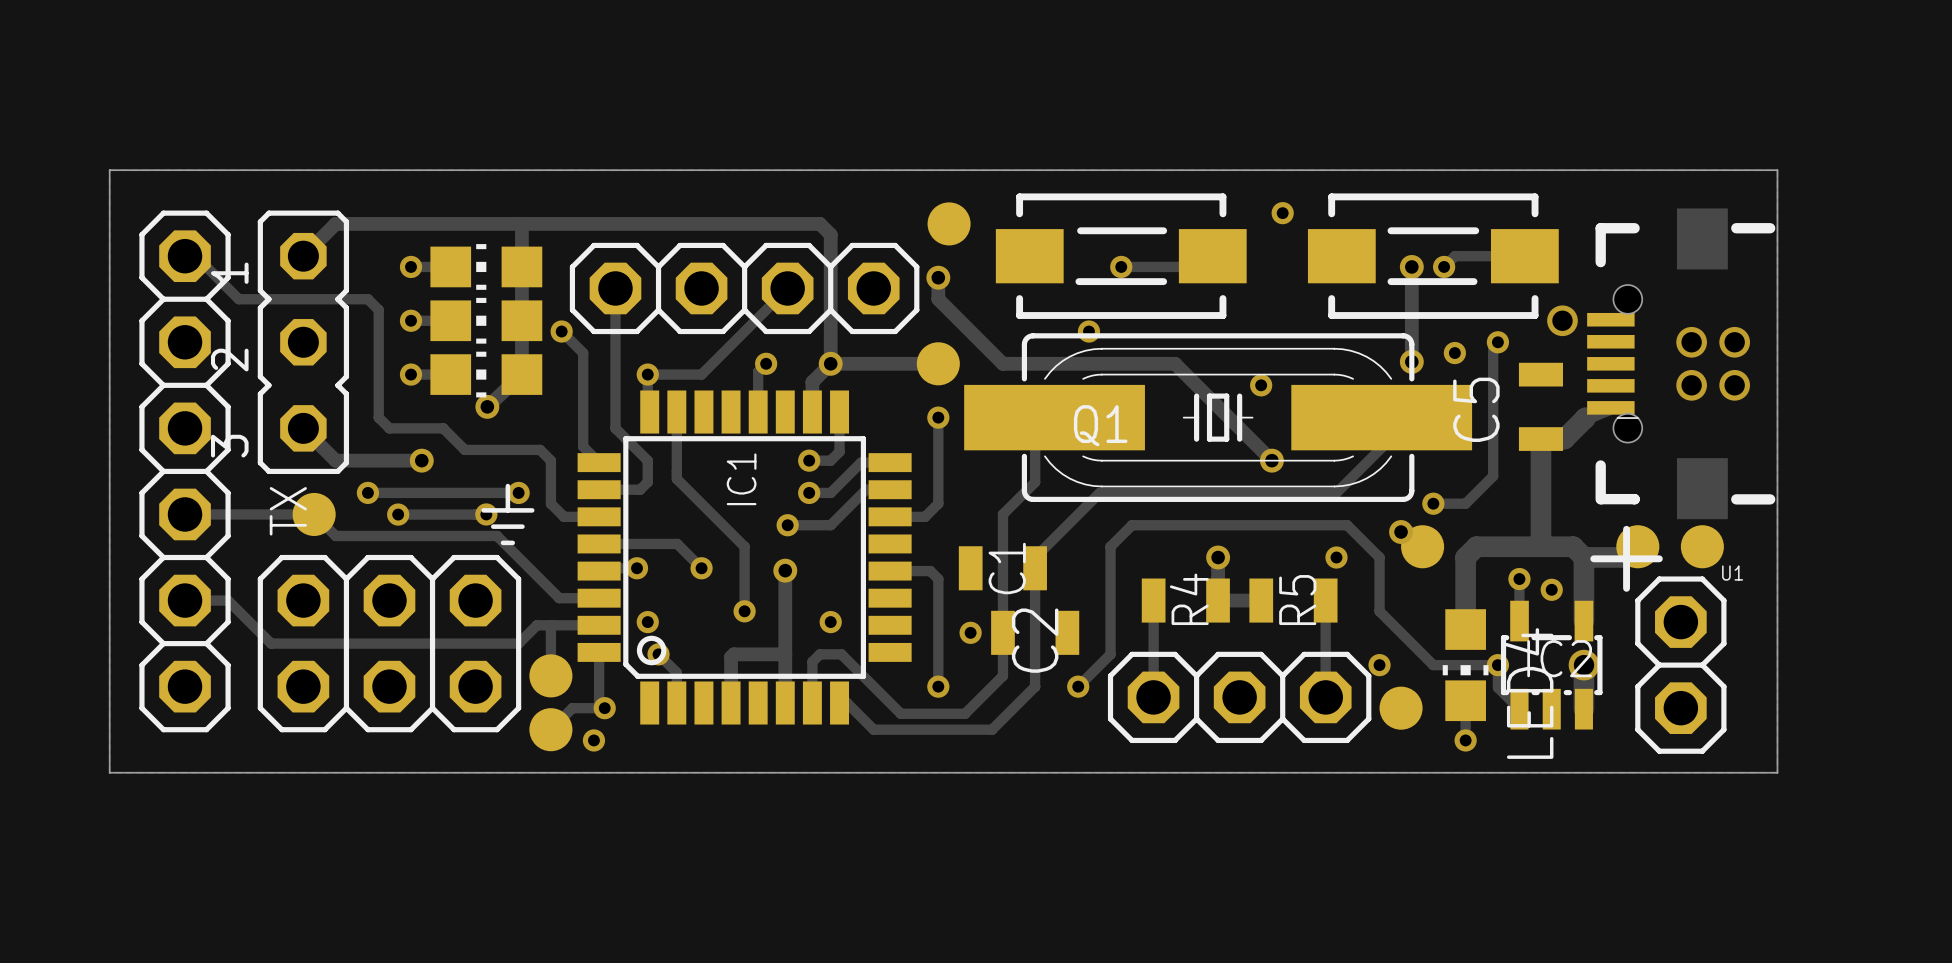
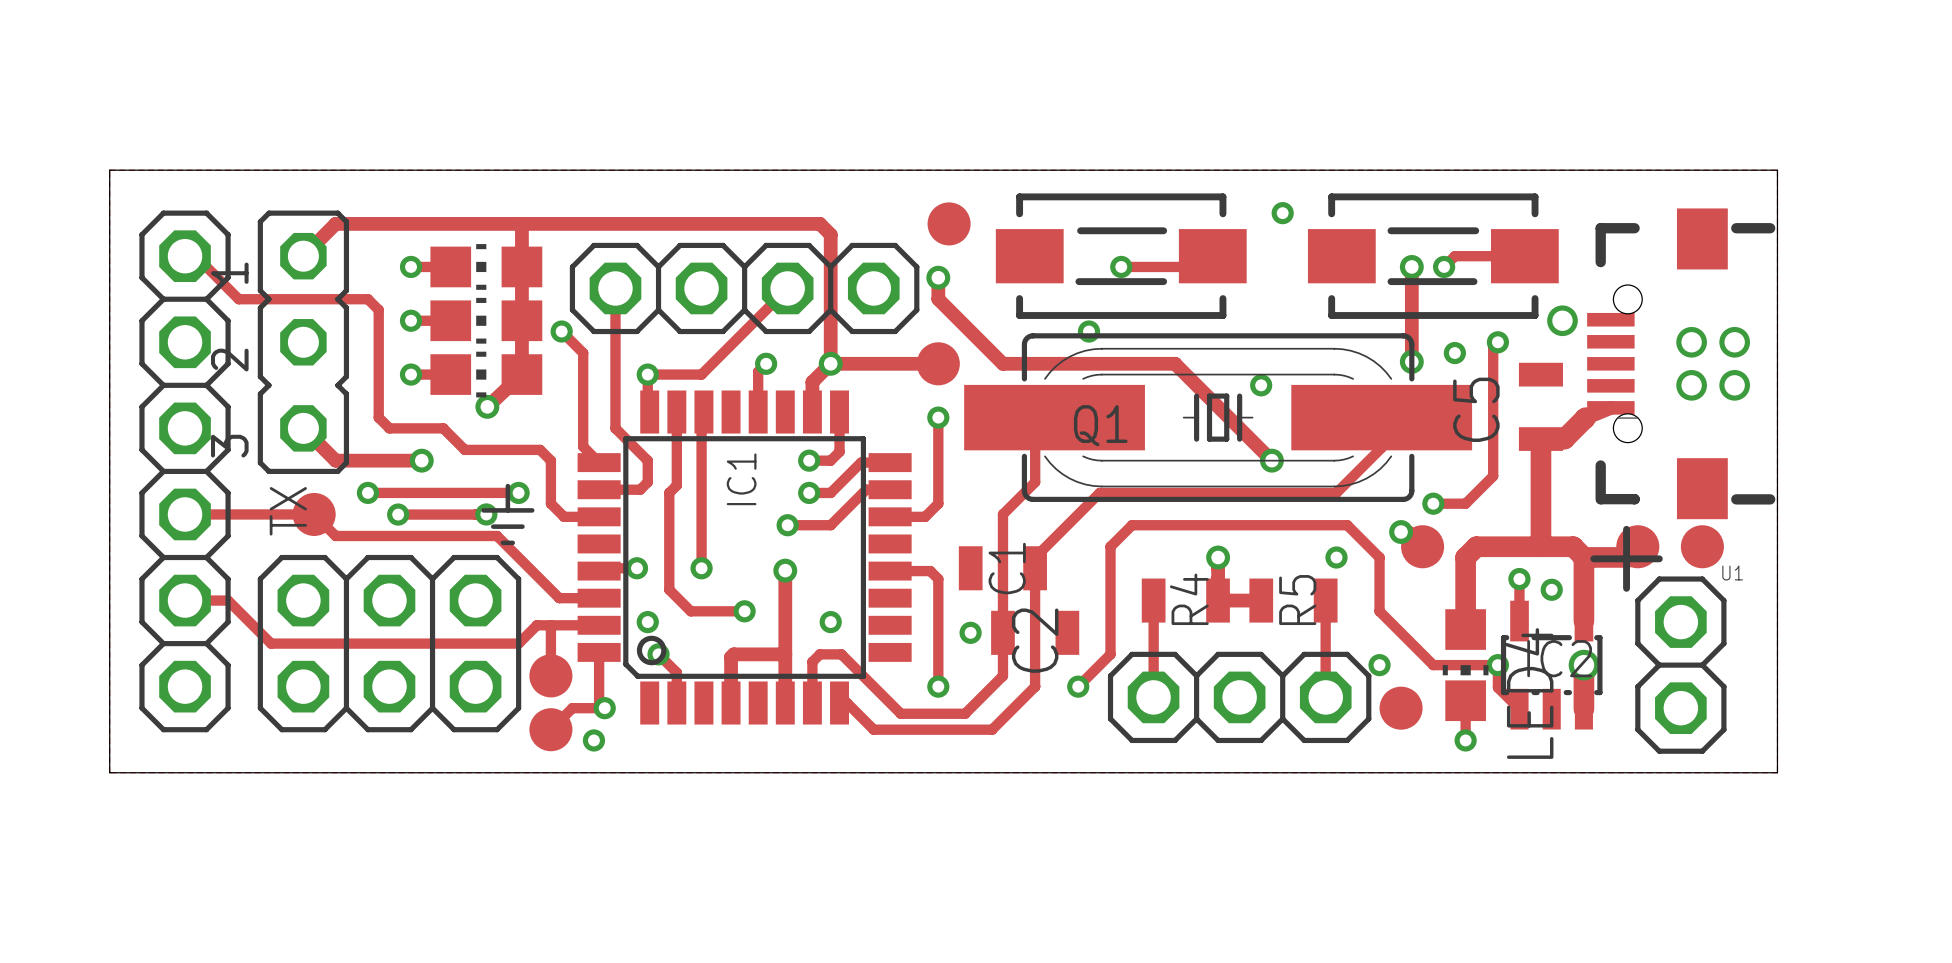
track: (676, 478) (744, 546) (744, 611) -> (676, 478) (676, 485) (669, 492) (669, 589) (690, 611) (744, 611)
track: (599, 543) (677, 543) (701, 568) -> (703, 412) (701, 414) (701, 568)

